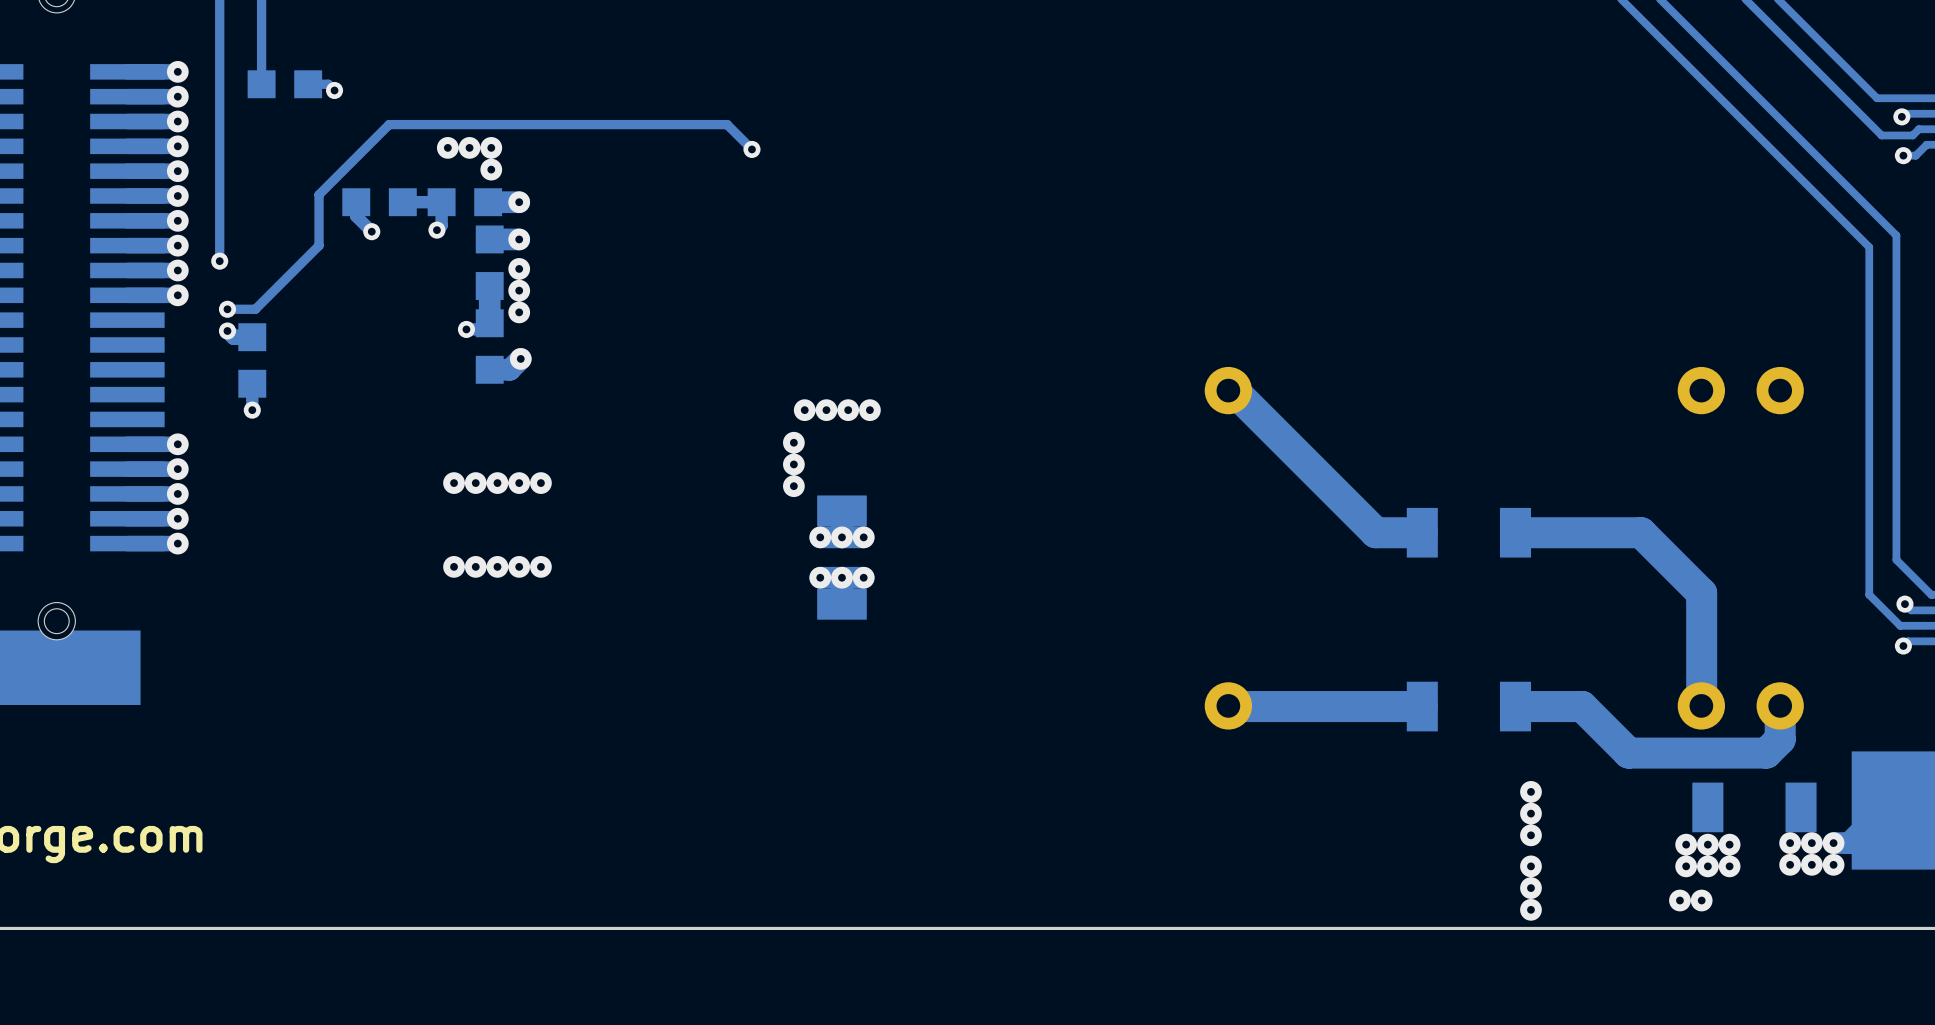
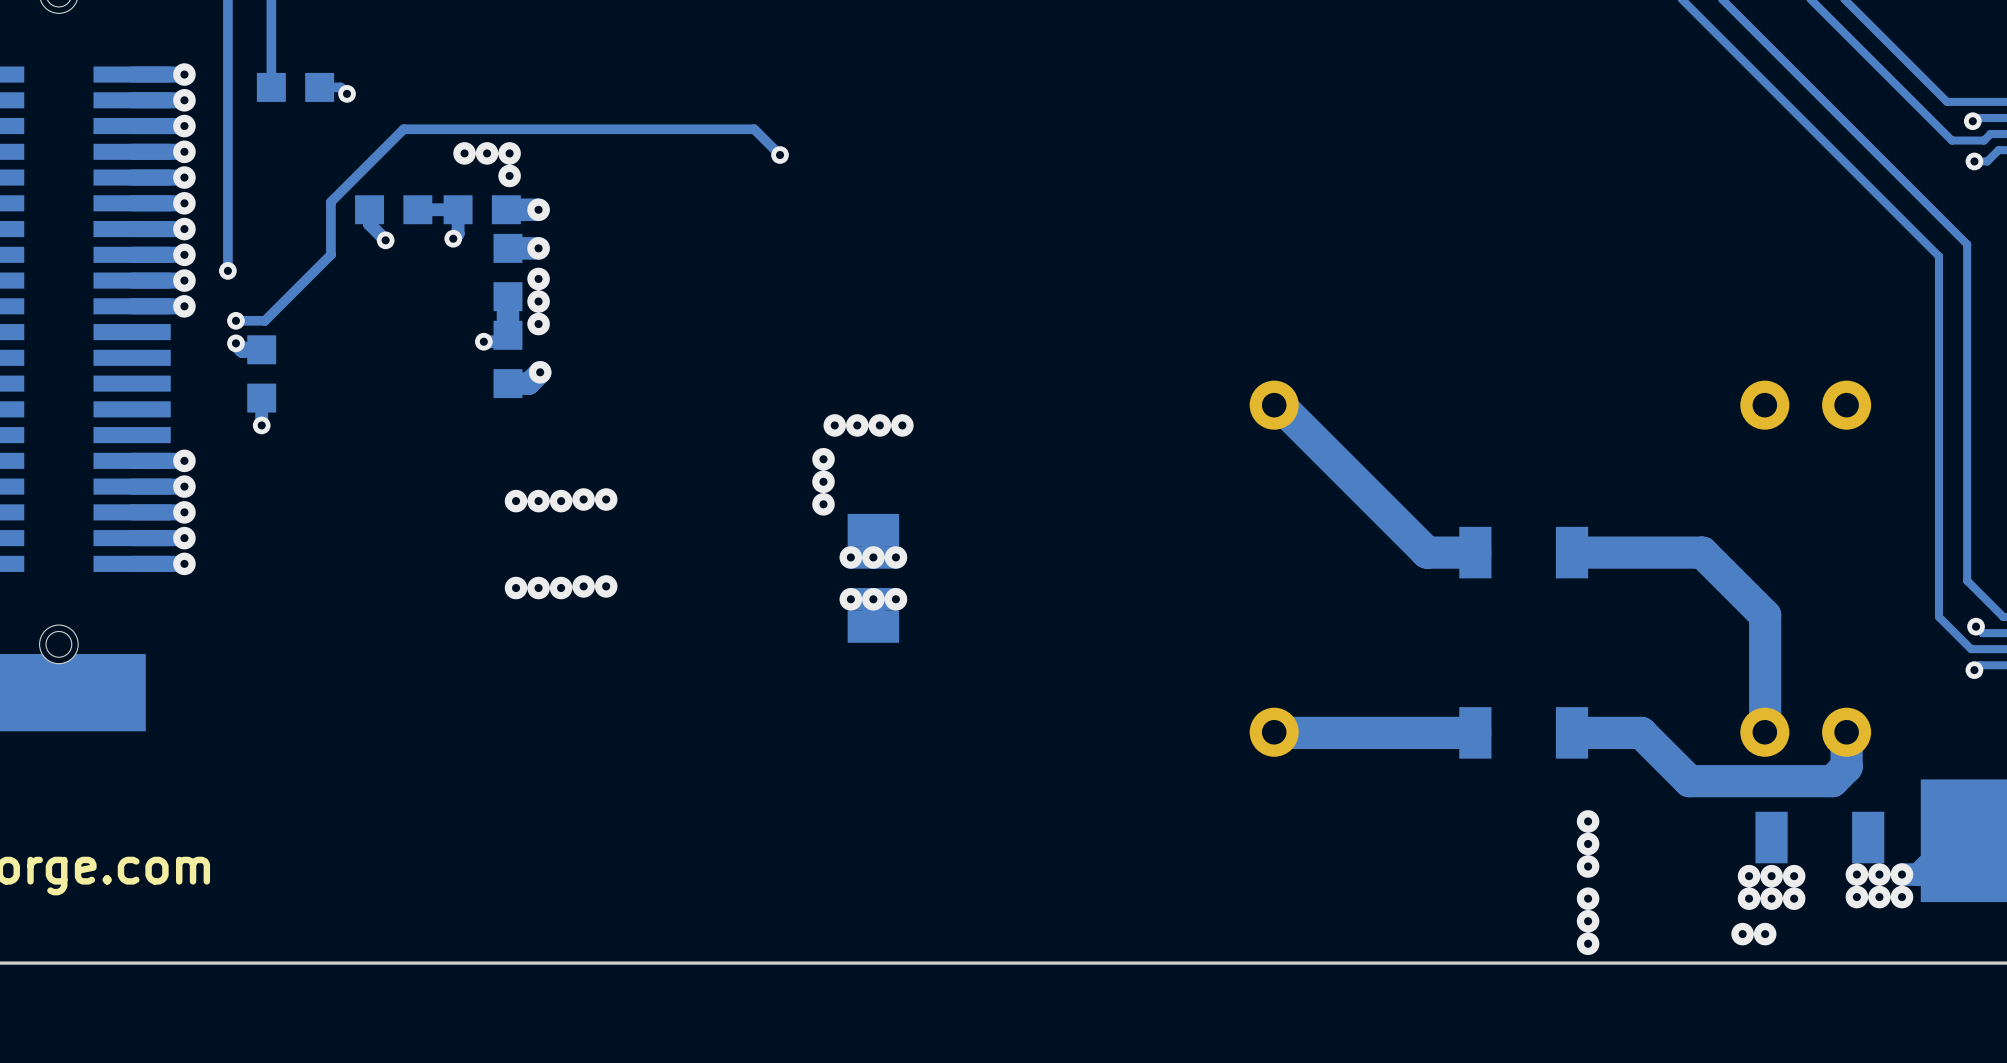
via: none -> (583, 499)
via: none -> (606, 499)
via: (454, 483) -> none
via: (475, 483) -> none
via: none -> (583, 586)
via: none -> (606, 586)
via: (454, 566) -> none
via: (475, 566) -> none

